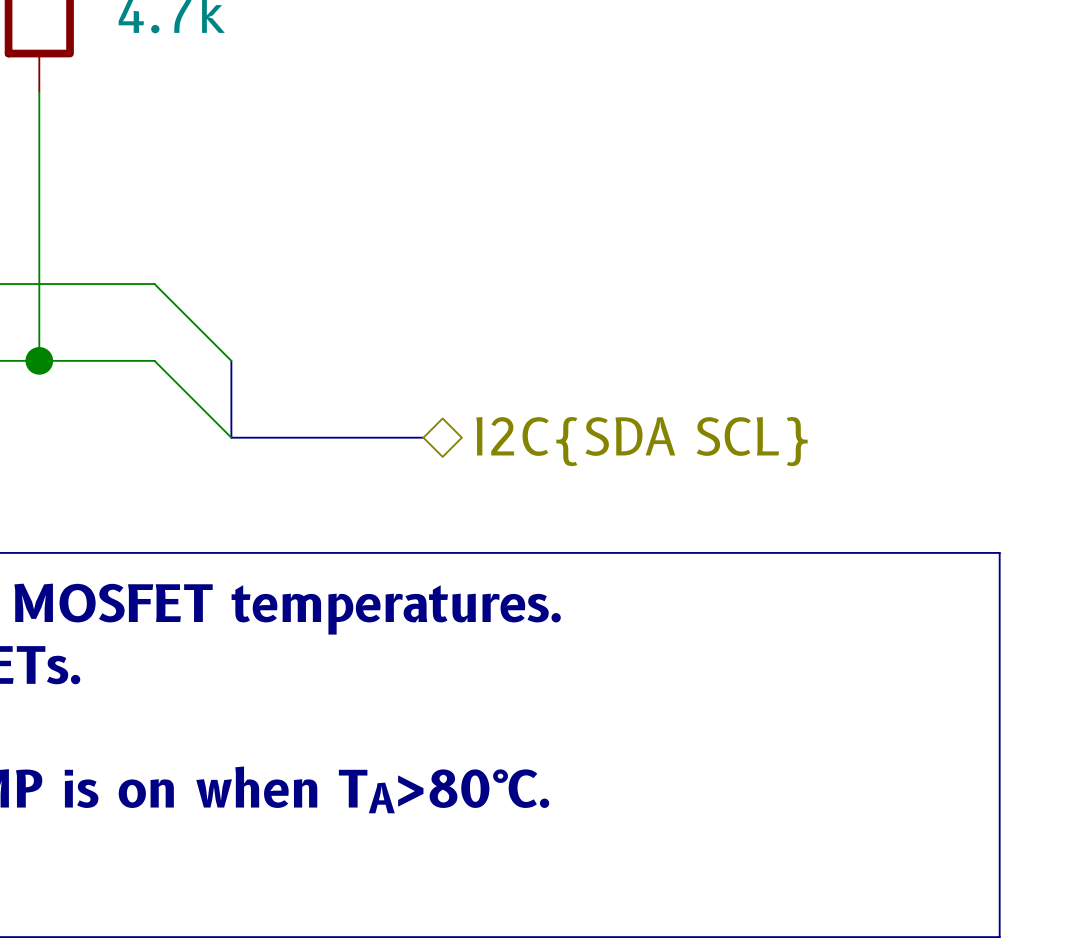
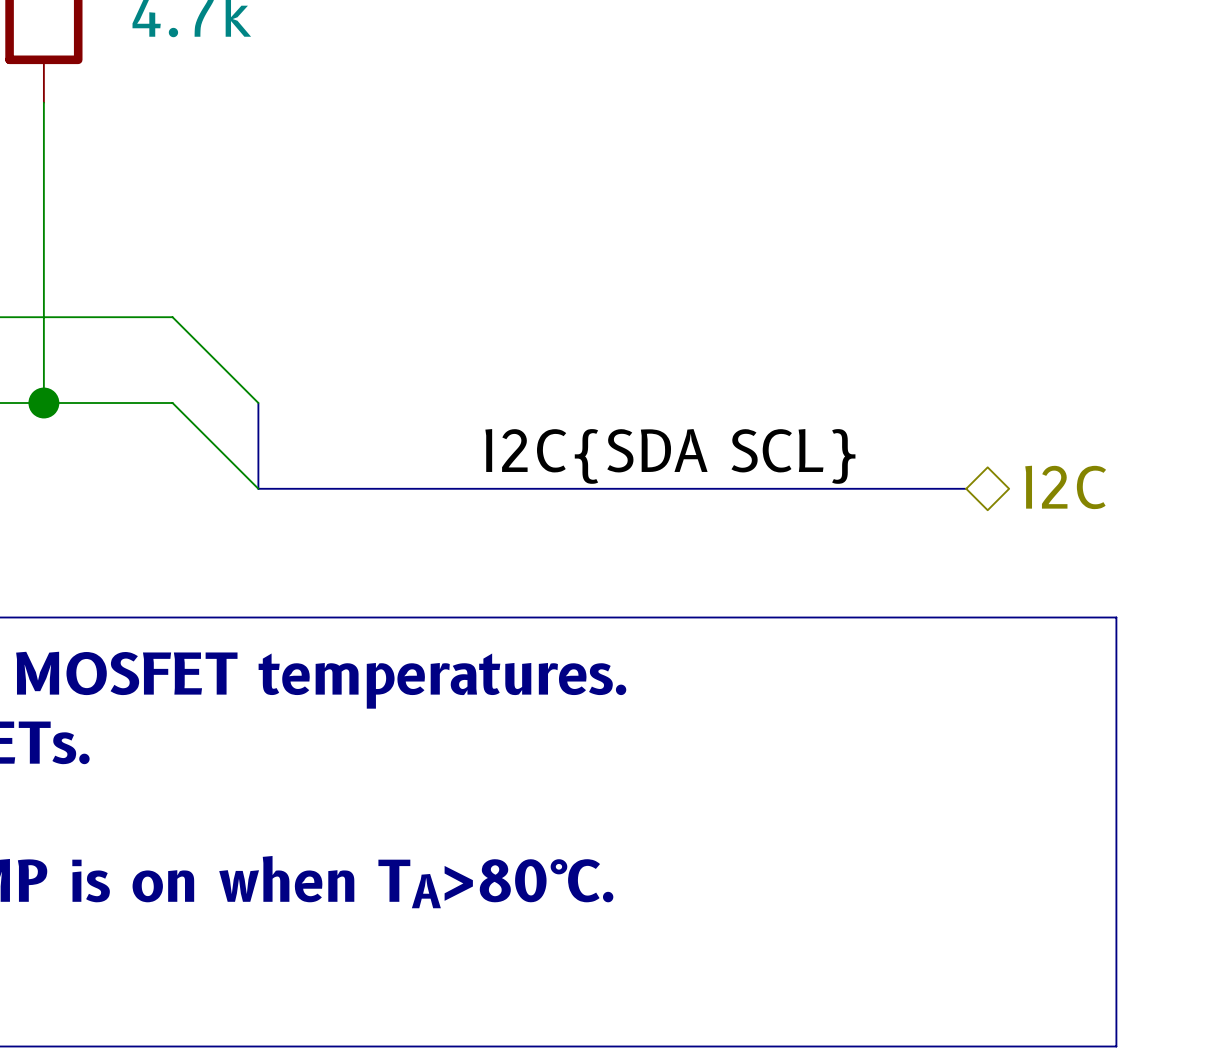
label: none -> I2C{SDA SCL} (670, 456)
hierarchical label: none -> I2C (1065, 487)
bus: none -> (472, 488) (966, 488)
hierarchical label: I2C{SDA SCL} (641, 441) -> none

